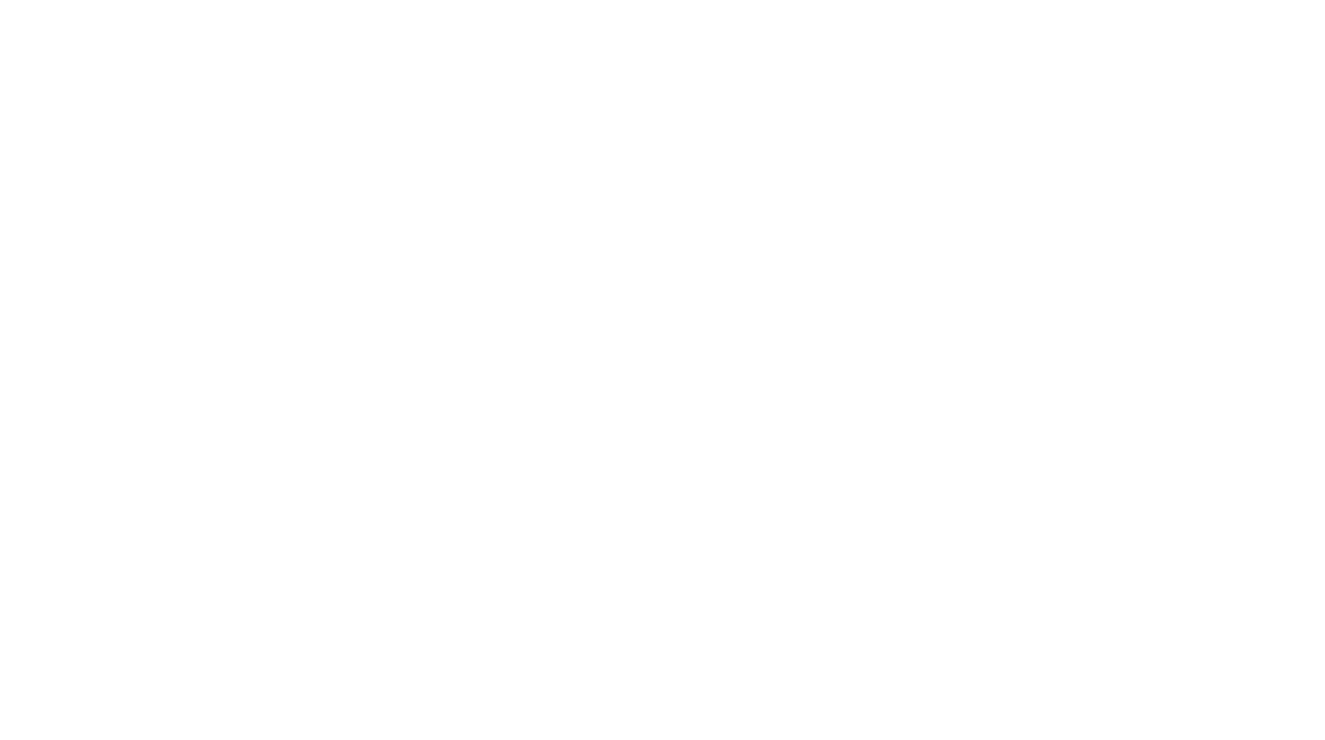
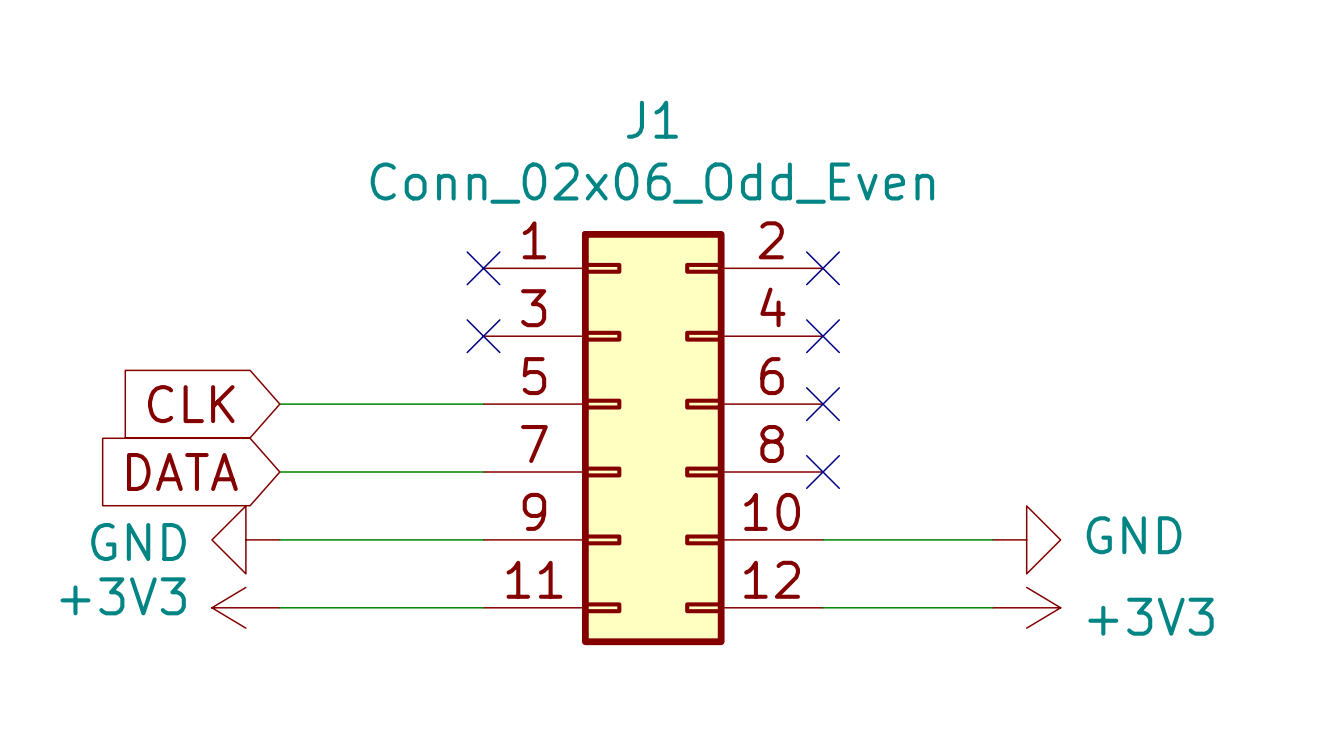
no-connect mark: none -> (483, 268)
no-connect mark: none -> (822, 268)
no-connect mark: none -> (483, 336)
no-connect mark: none -> (822, 336)
global label: none -> CLK (191, 404)
wire: none -> (279, 404) (483, 404)
no-connect mark: none -> (822, 404)
J1: none -> Conn_02x06_Odd_Even (653, 438)
global label: none -> DATA (182, 472)
wire: none -> (279, 472) (483, 472)
no-connect mark: none -> (822, 472)
power symbol: none -> GND (245, 539)
wire: none -> (279, 539) (483, 539)
wire: none -> (822, 539) (992, 539)
power symbol: none -> GND (1026, 539)
power symbol: none -> +3V3 (245, 607)
wire: none -> (279, 607) (483, 607)
wire: none -> (822, 607) (992, 607)
power symbol: none -> +3V3 (1026, 607)

